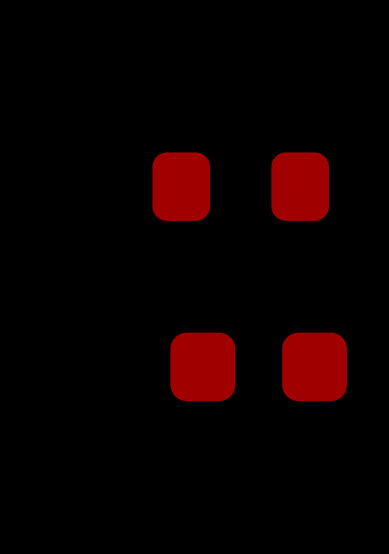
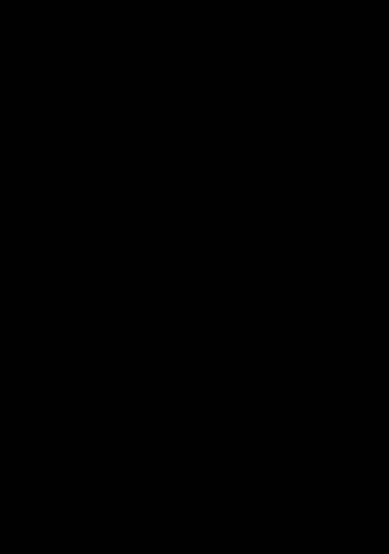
part: (240, 186) -> none
part: (258, 366) -> none

